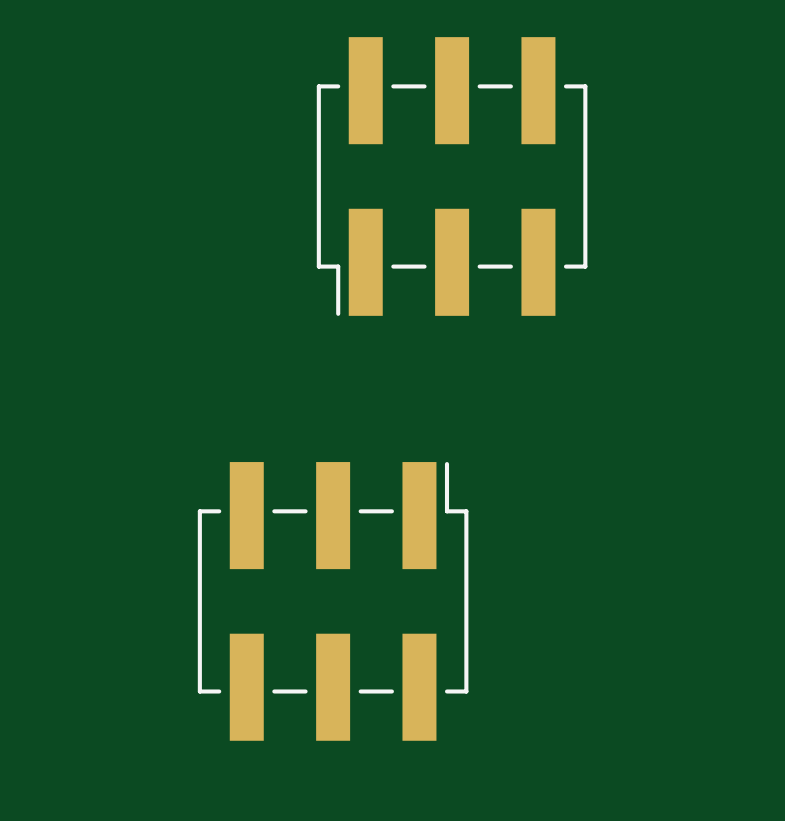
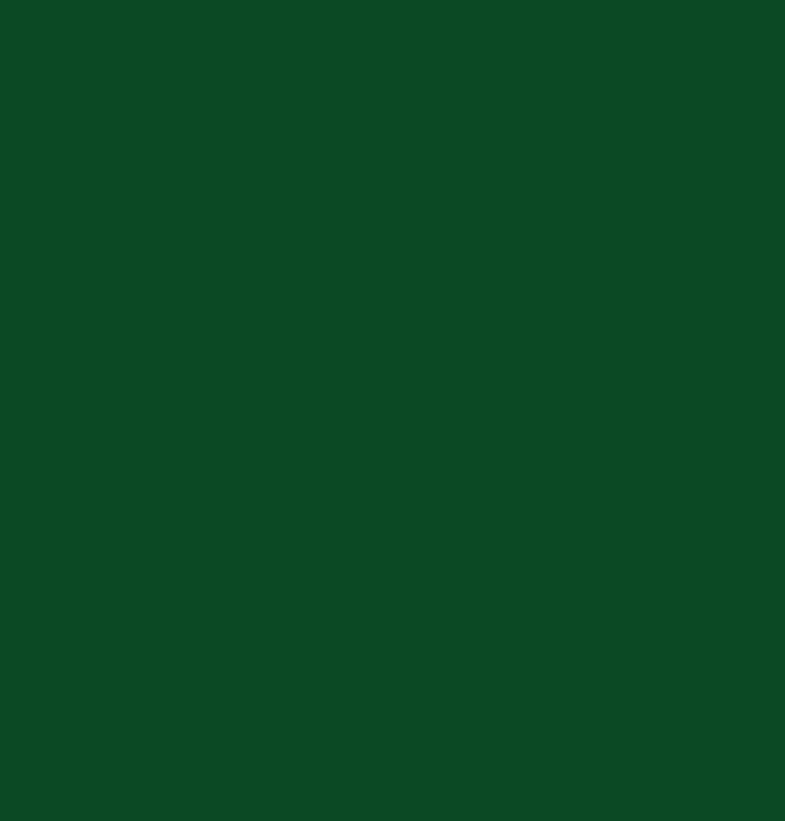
part: (452, 176) -> none
part: (333, 601) -> none

